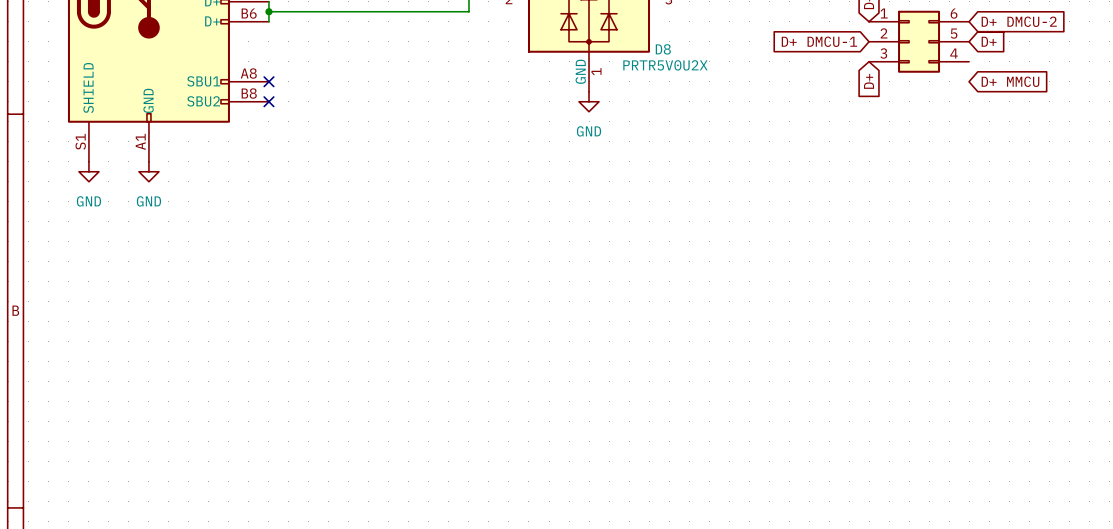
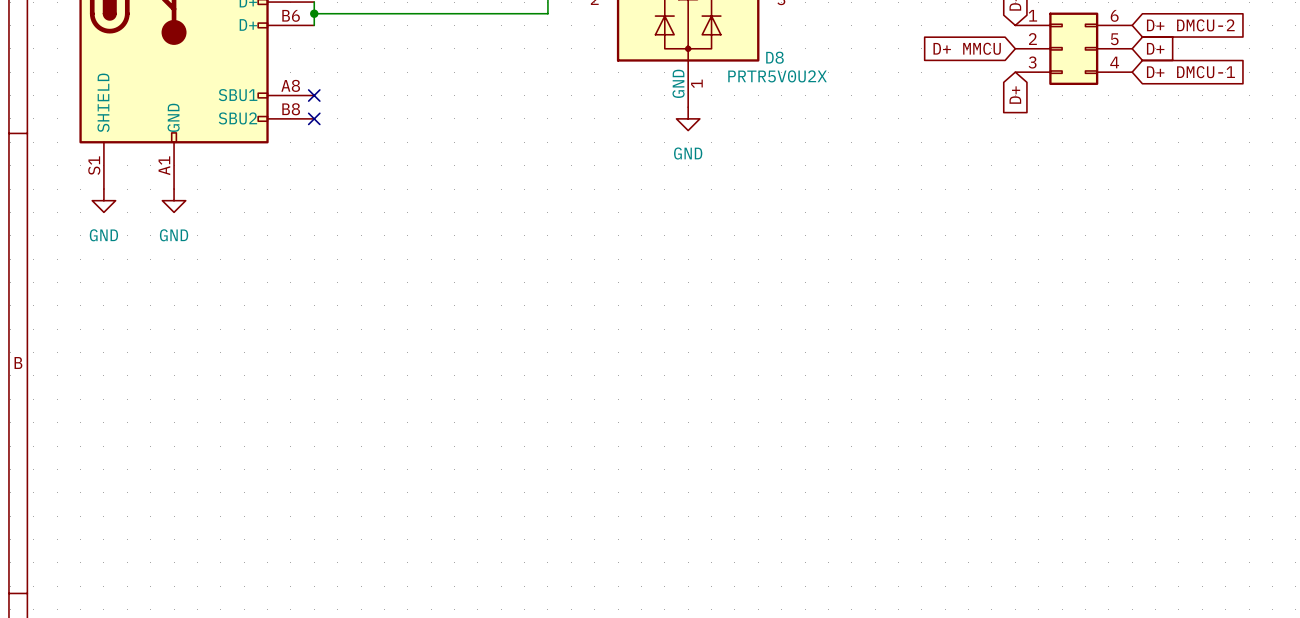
global label: D+ DMCU-1 (819, 41) -> D+ MMCU (967, 48)
global label: D+ MMCU (1010, 81) -> D+ DMCU-1 (1190, 72)

